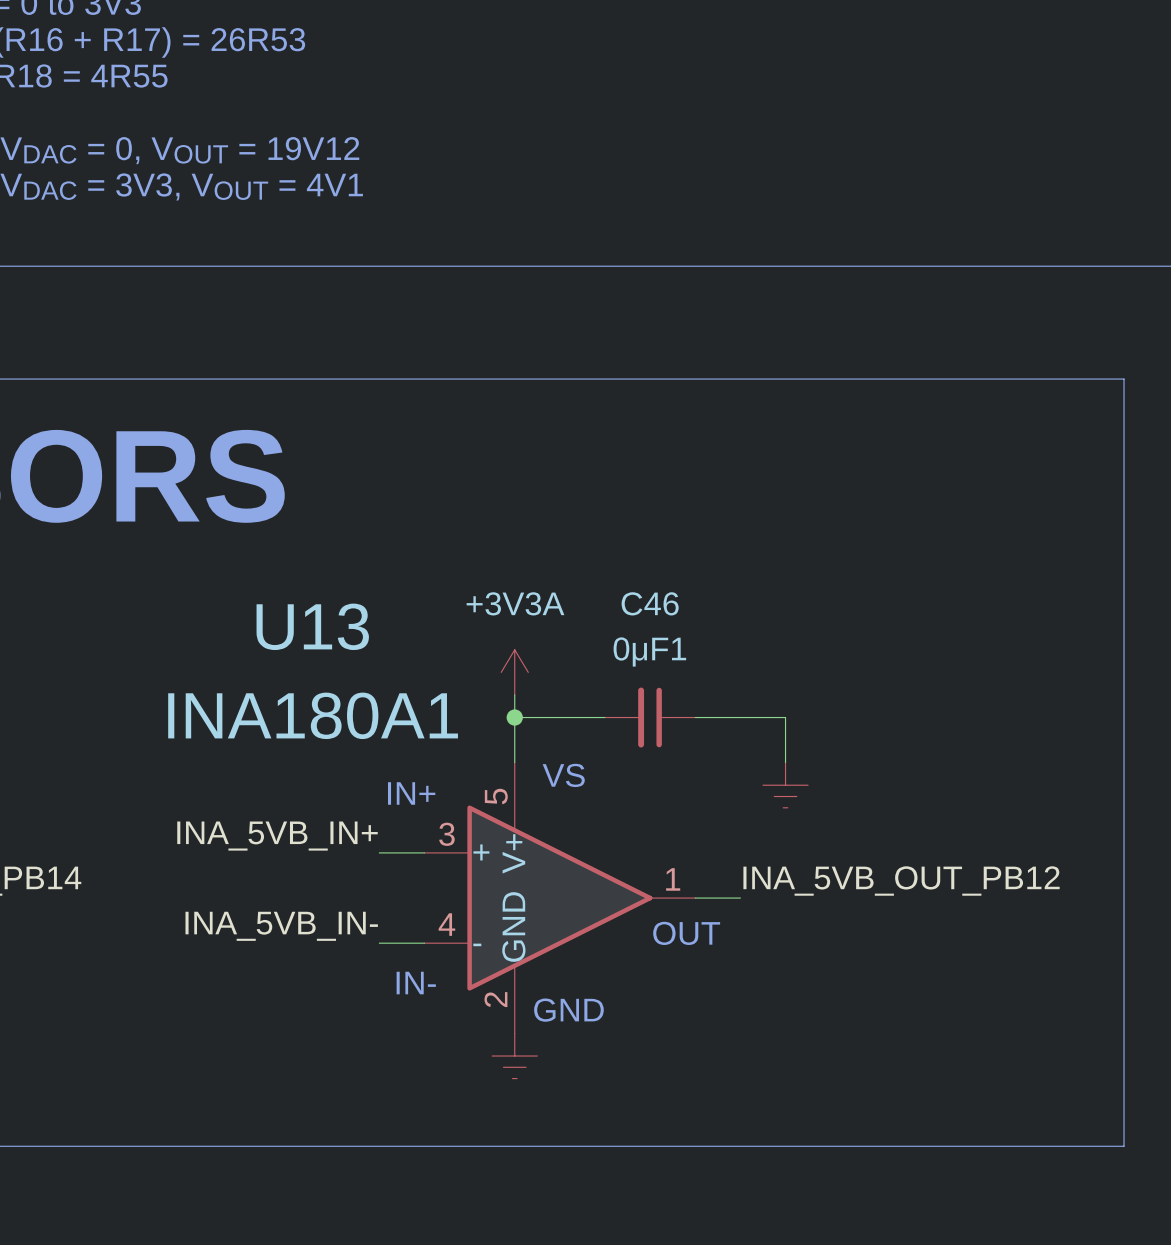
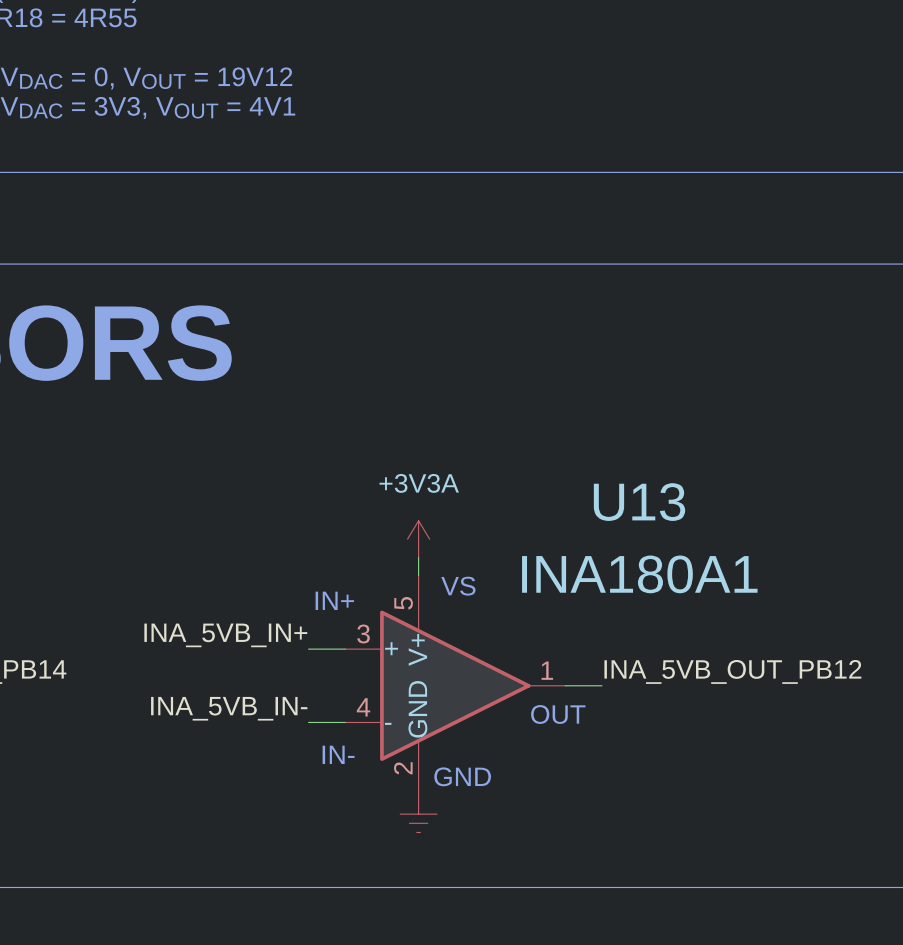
U13 name position: U13 (312, 626) -> U13 (639, 502)
power symbol position: +3V3A (514, 672) -> +3V3A (418, 539)
U13 value position: INA180A1 (313, 715) -> INA180A1 (639, 574)
wire: (514, 717) (605, 717) -> none
junction: (514, 717) -> none
C46: 0μF1 (650, 717) -> none
wire: (695, 717) (785, 717) (785, 762) -> none
power symbol: (785, 785) -> none

